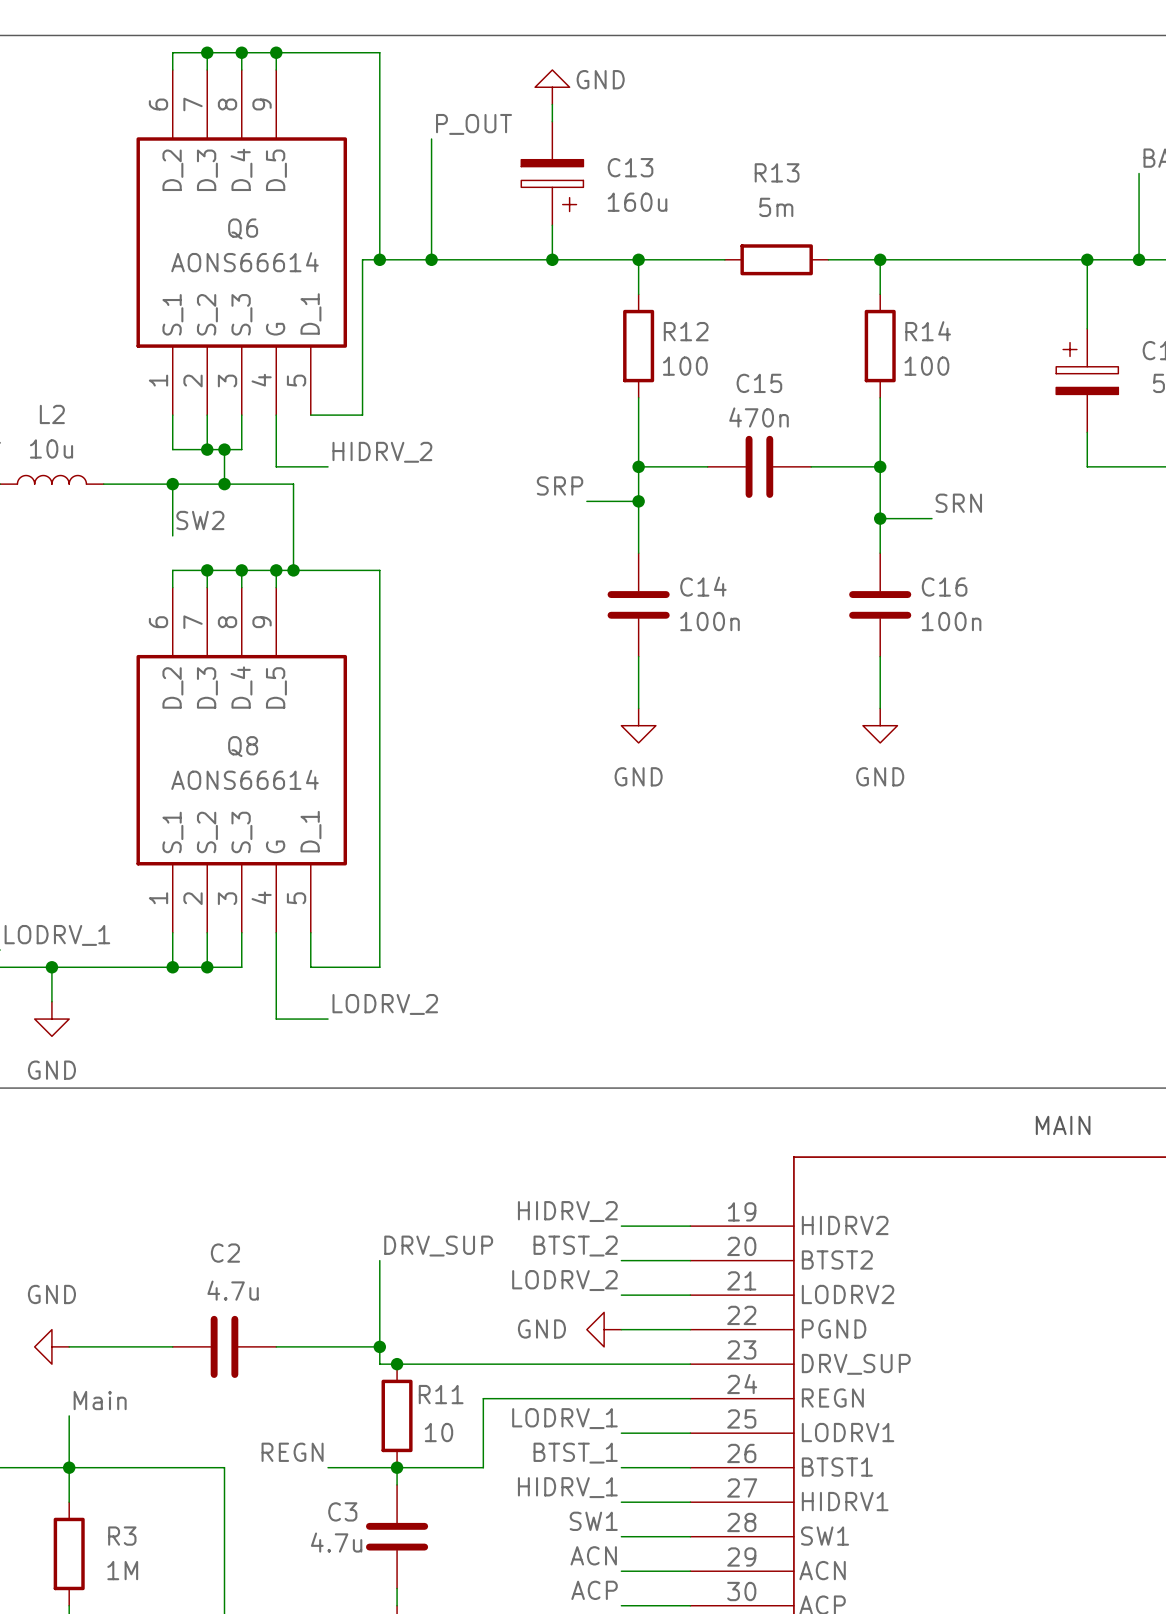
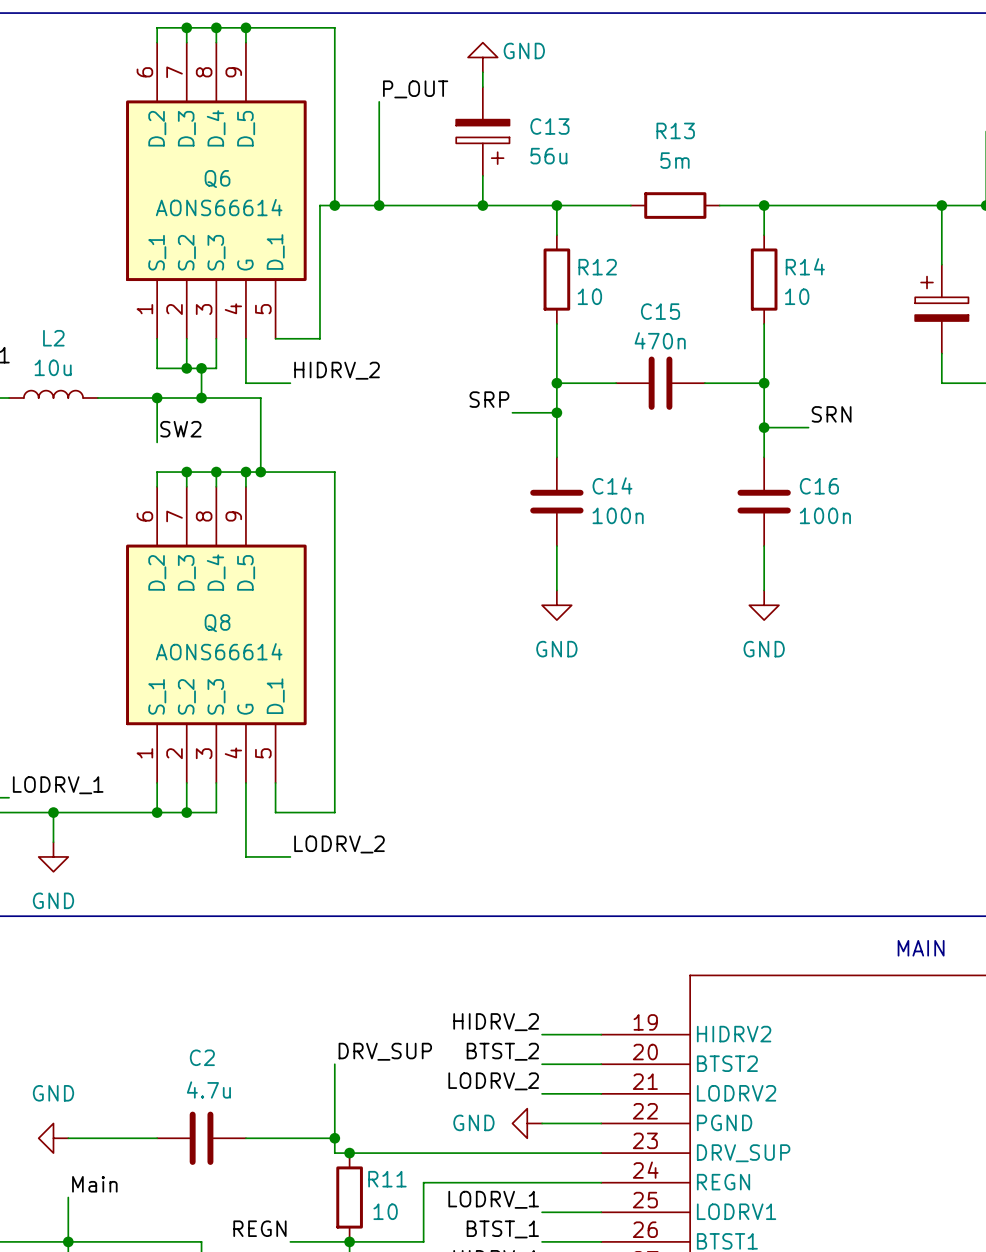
C13 value: 160u (637, 202) -> 56u (548, 156)
R12 value: 100 (685, 366) -> 10 (589, 296)
R14 value: 100 (926, 366) -> 10 (797, 296)

